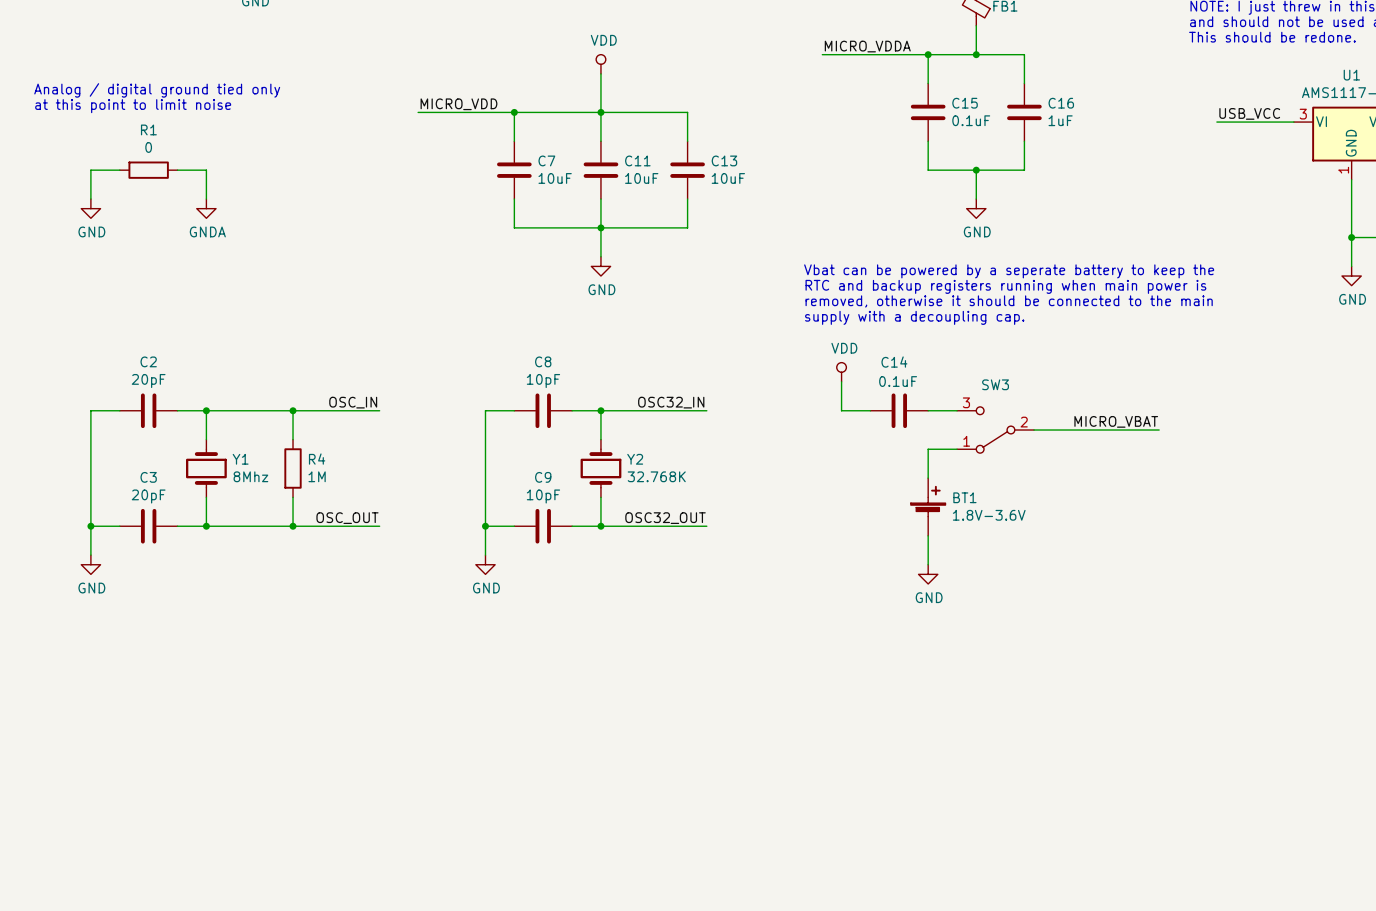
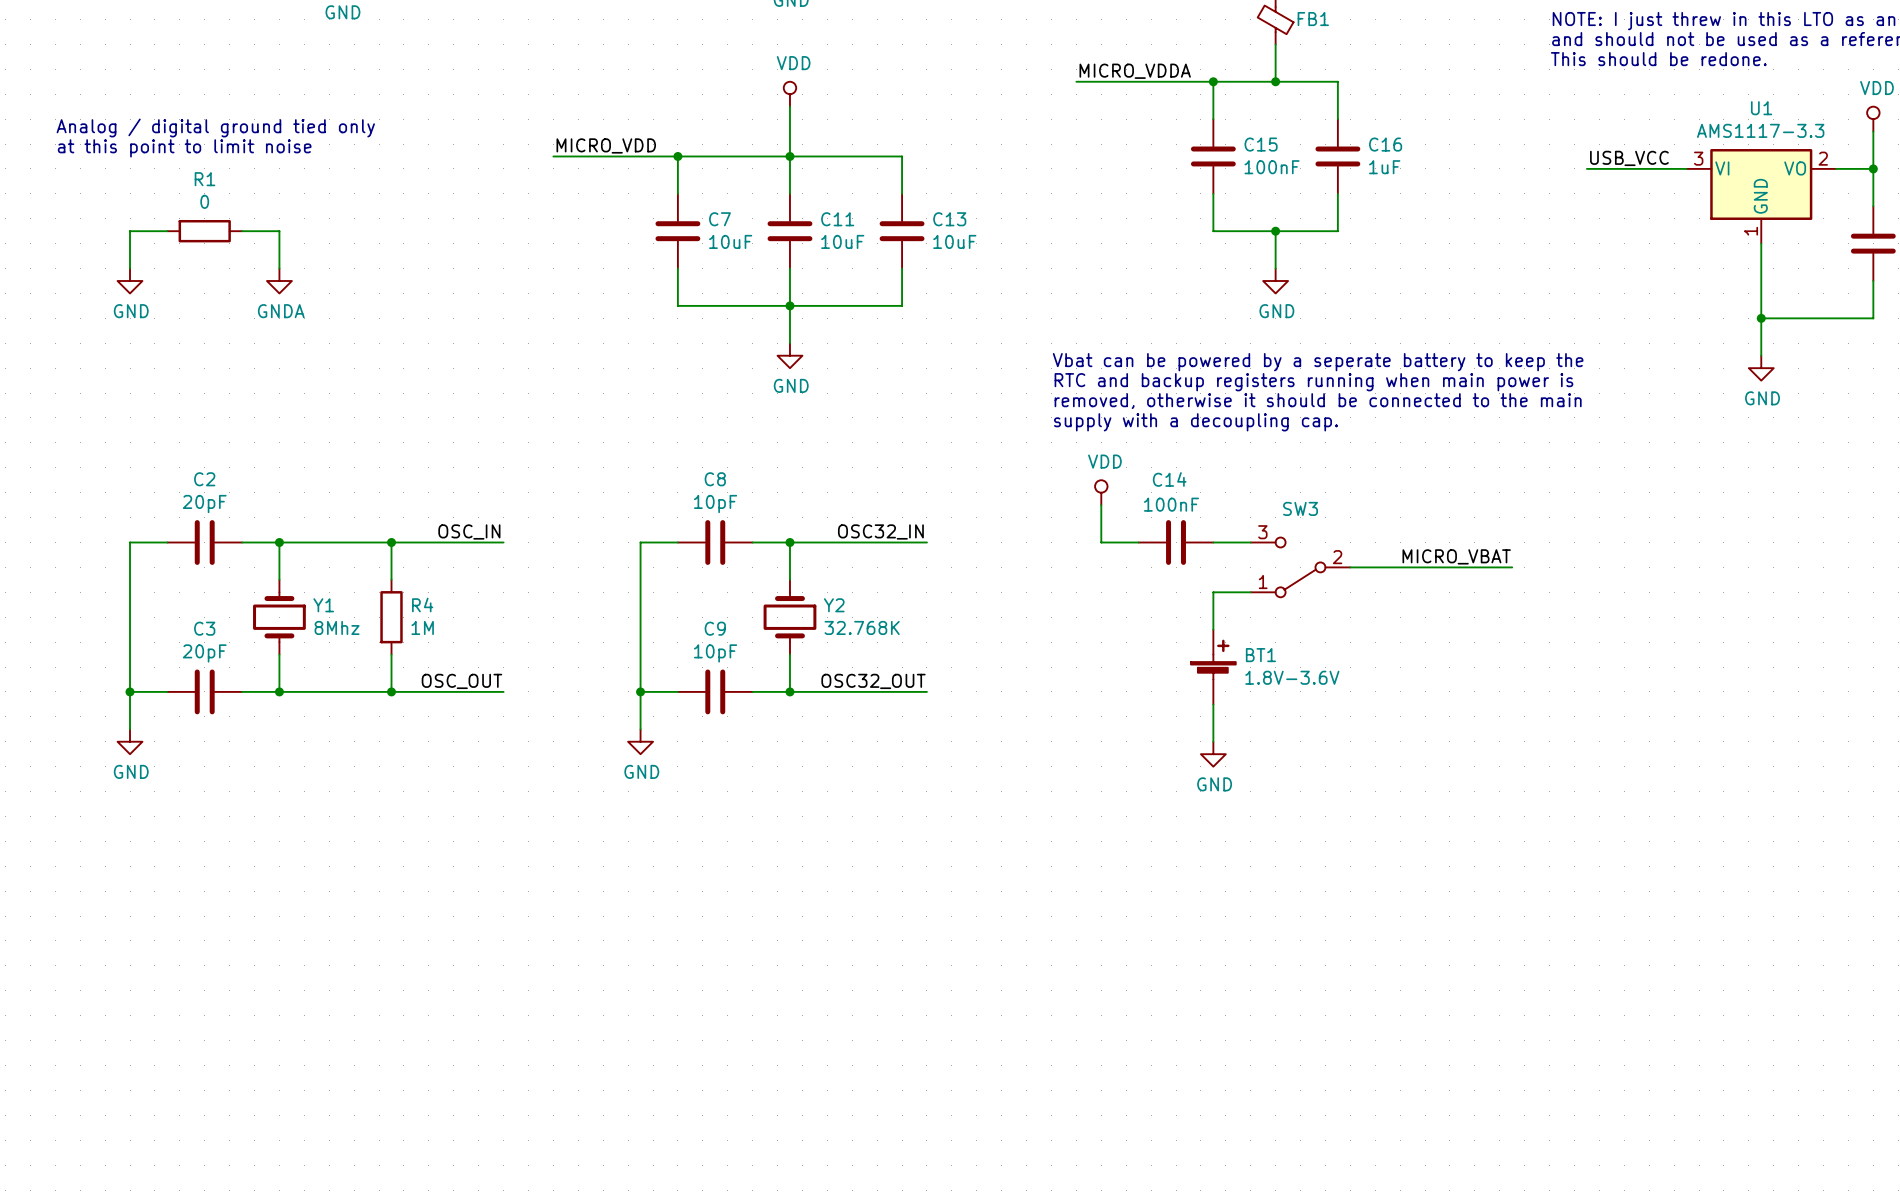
C15 value: 0.1uF (971, 120) -> 100nF (1272, 167)
C14 value: 0.1uF (898, 381) -> 100nF (1171, 504)

